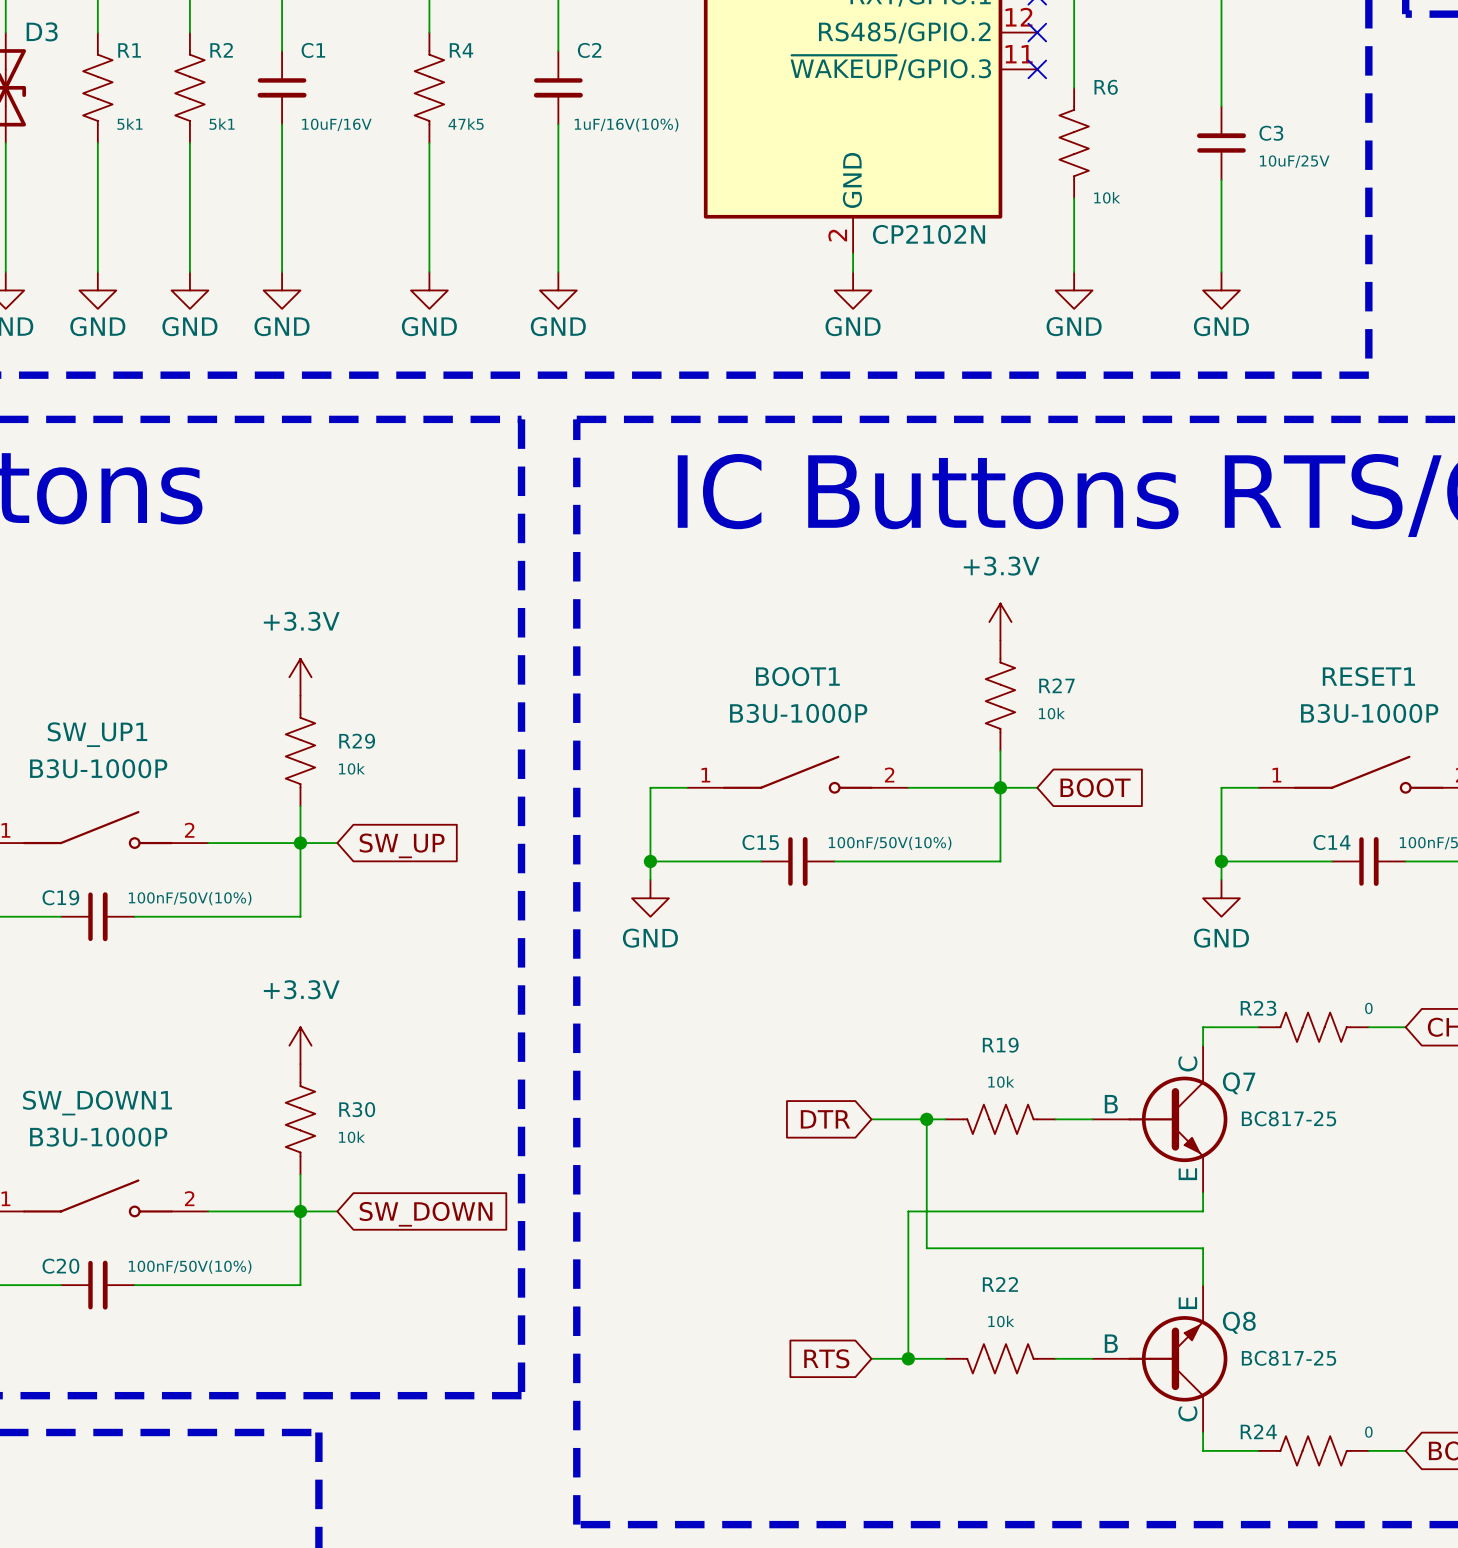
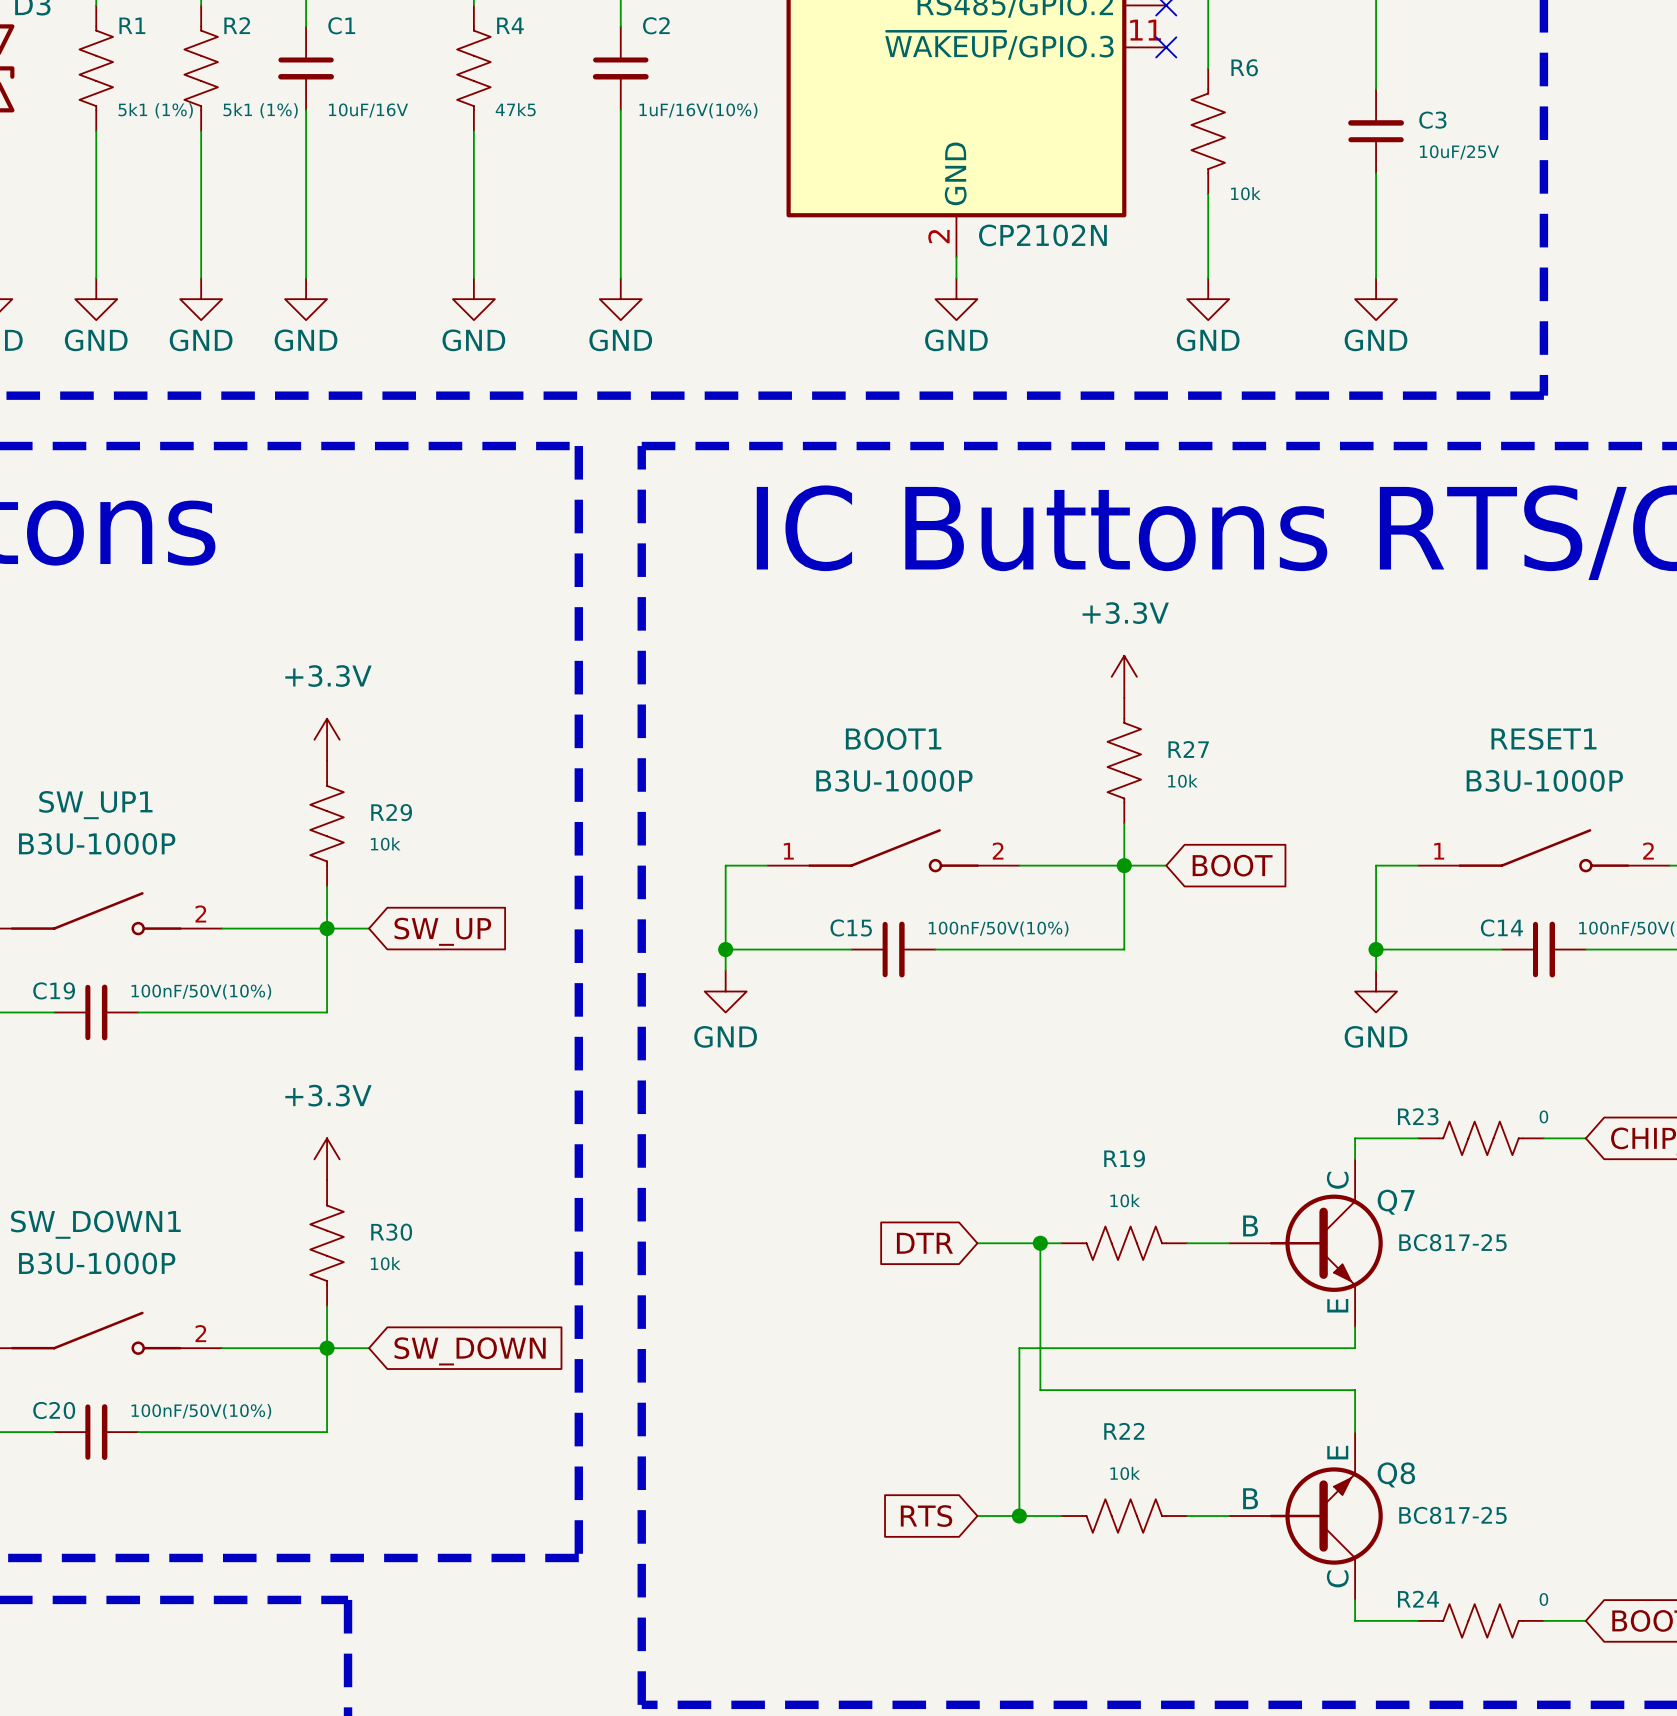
R1 value: 5k1 (129, 124) -> 5k1 (1%) (155, 110)
R2 value: 5k1 (222, 124) -> 5k1 (1%) (260, 110)

